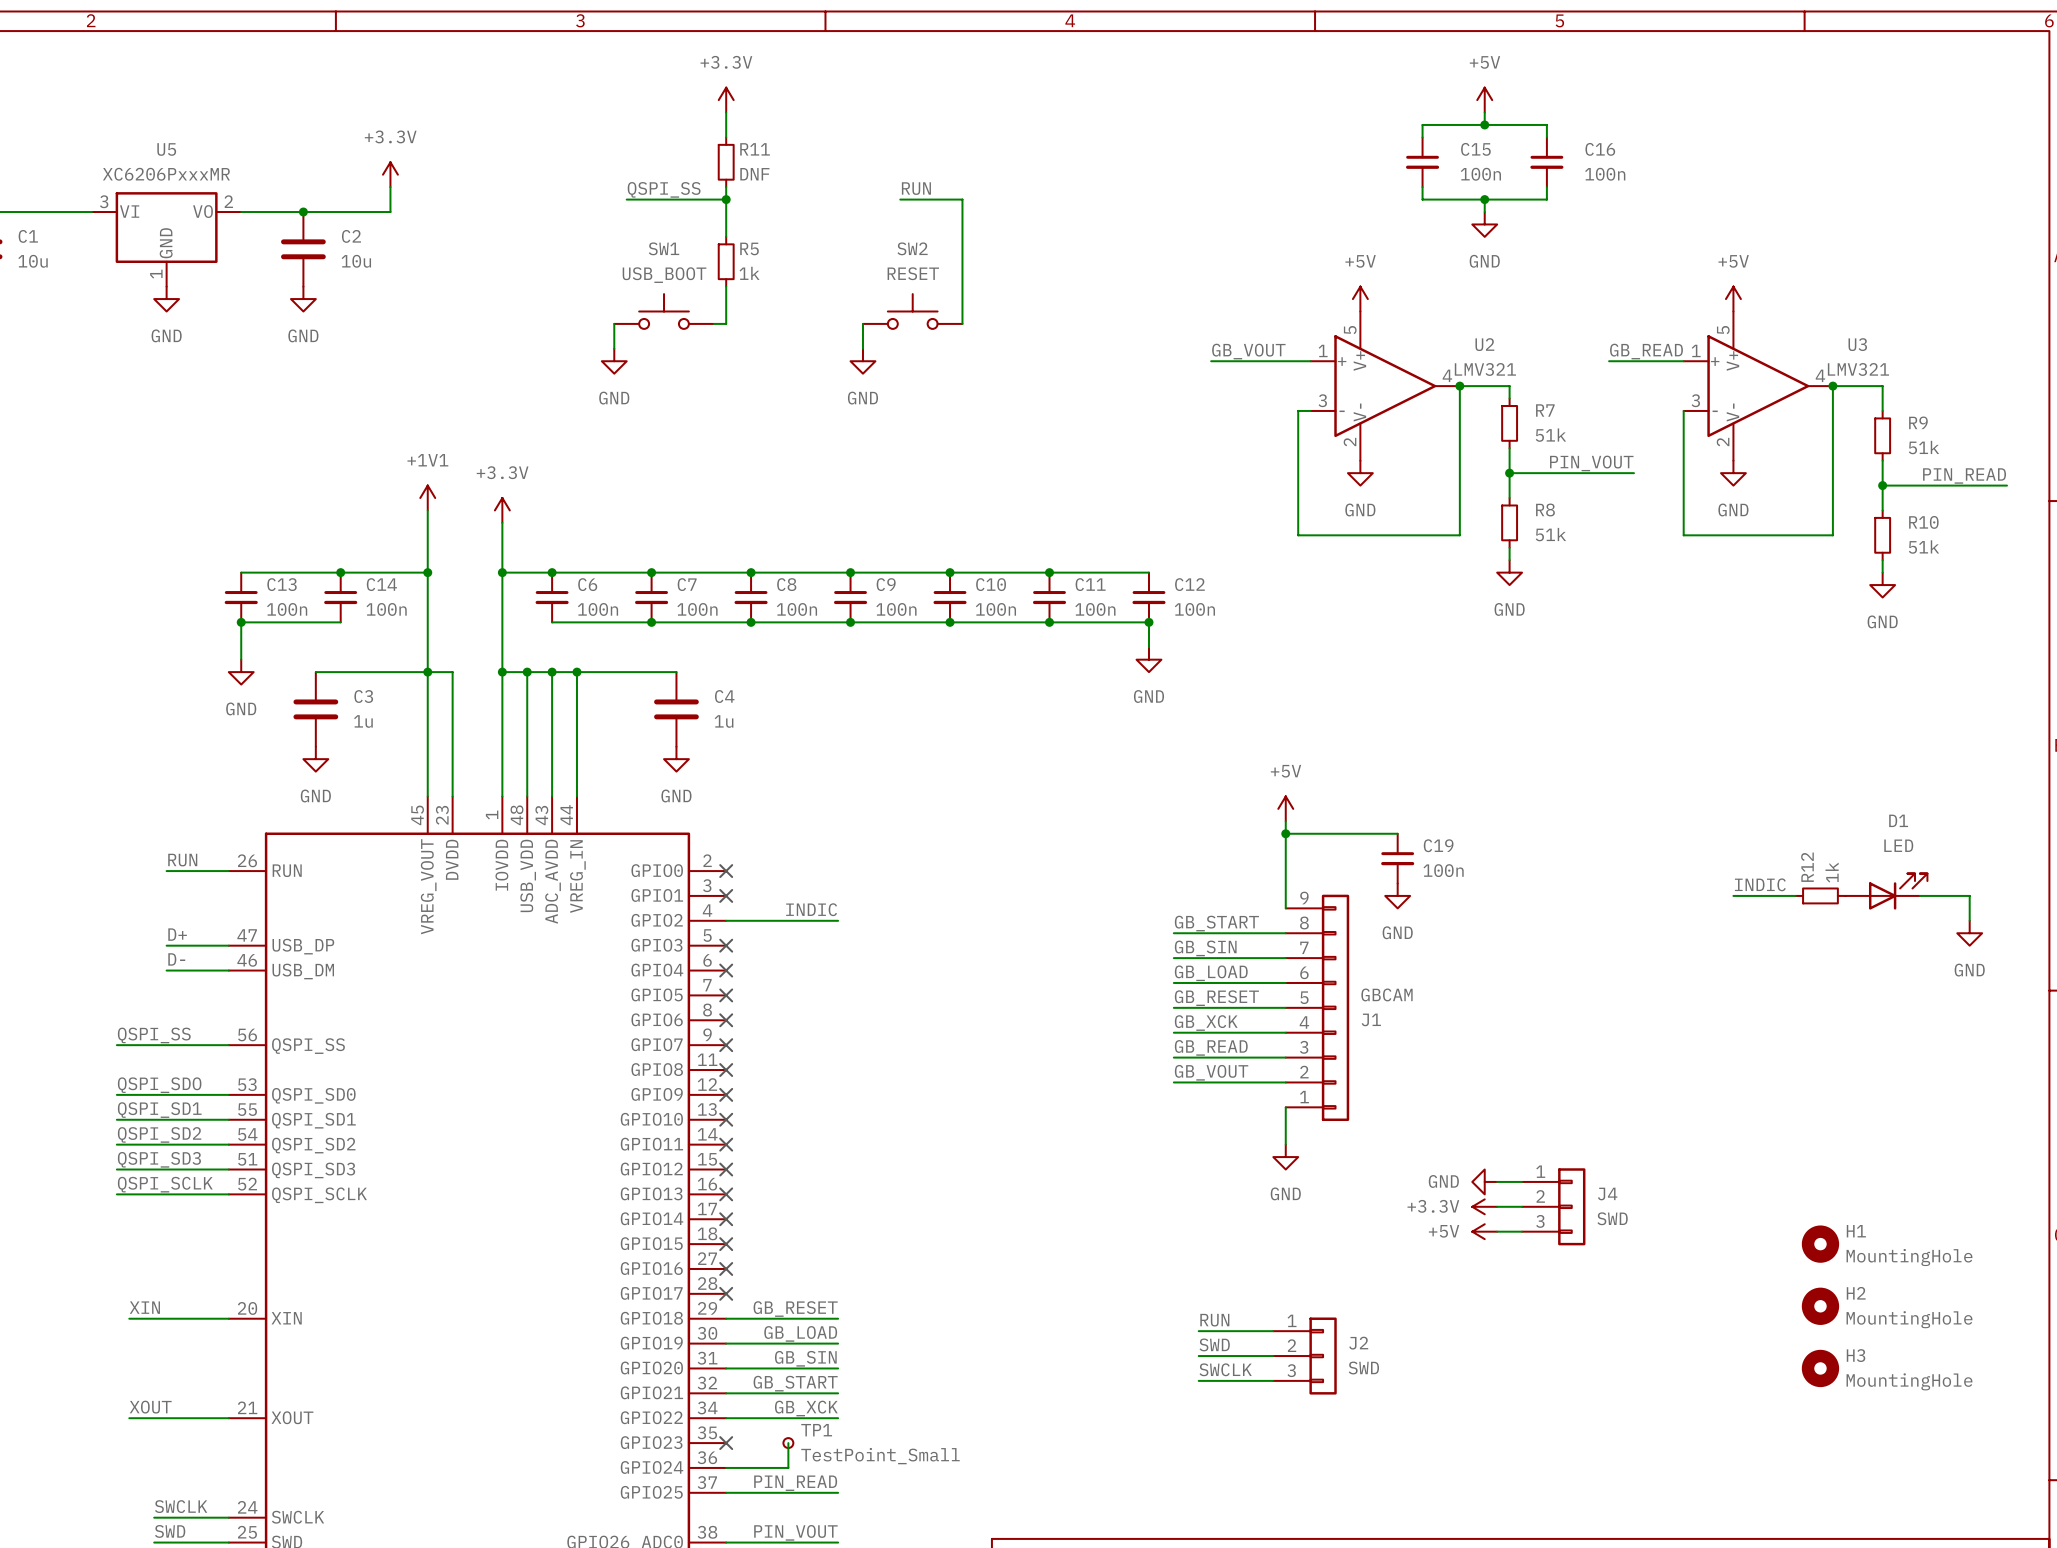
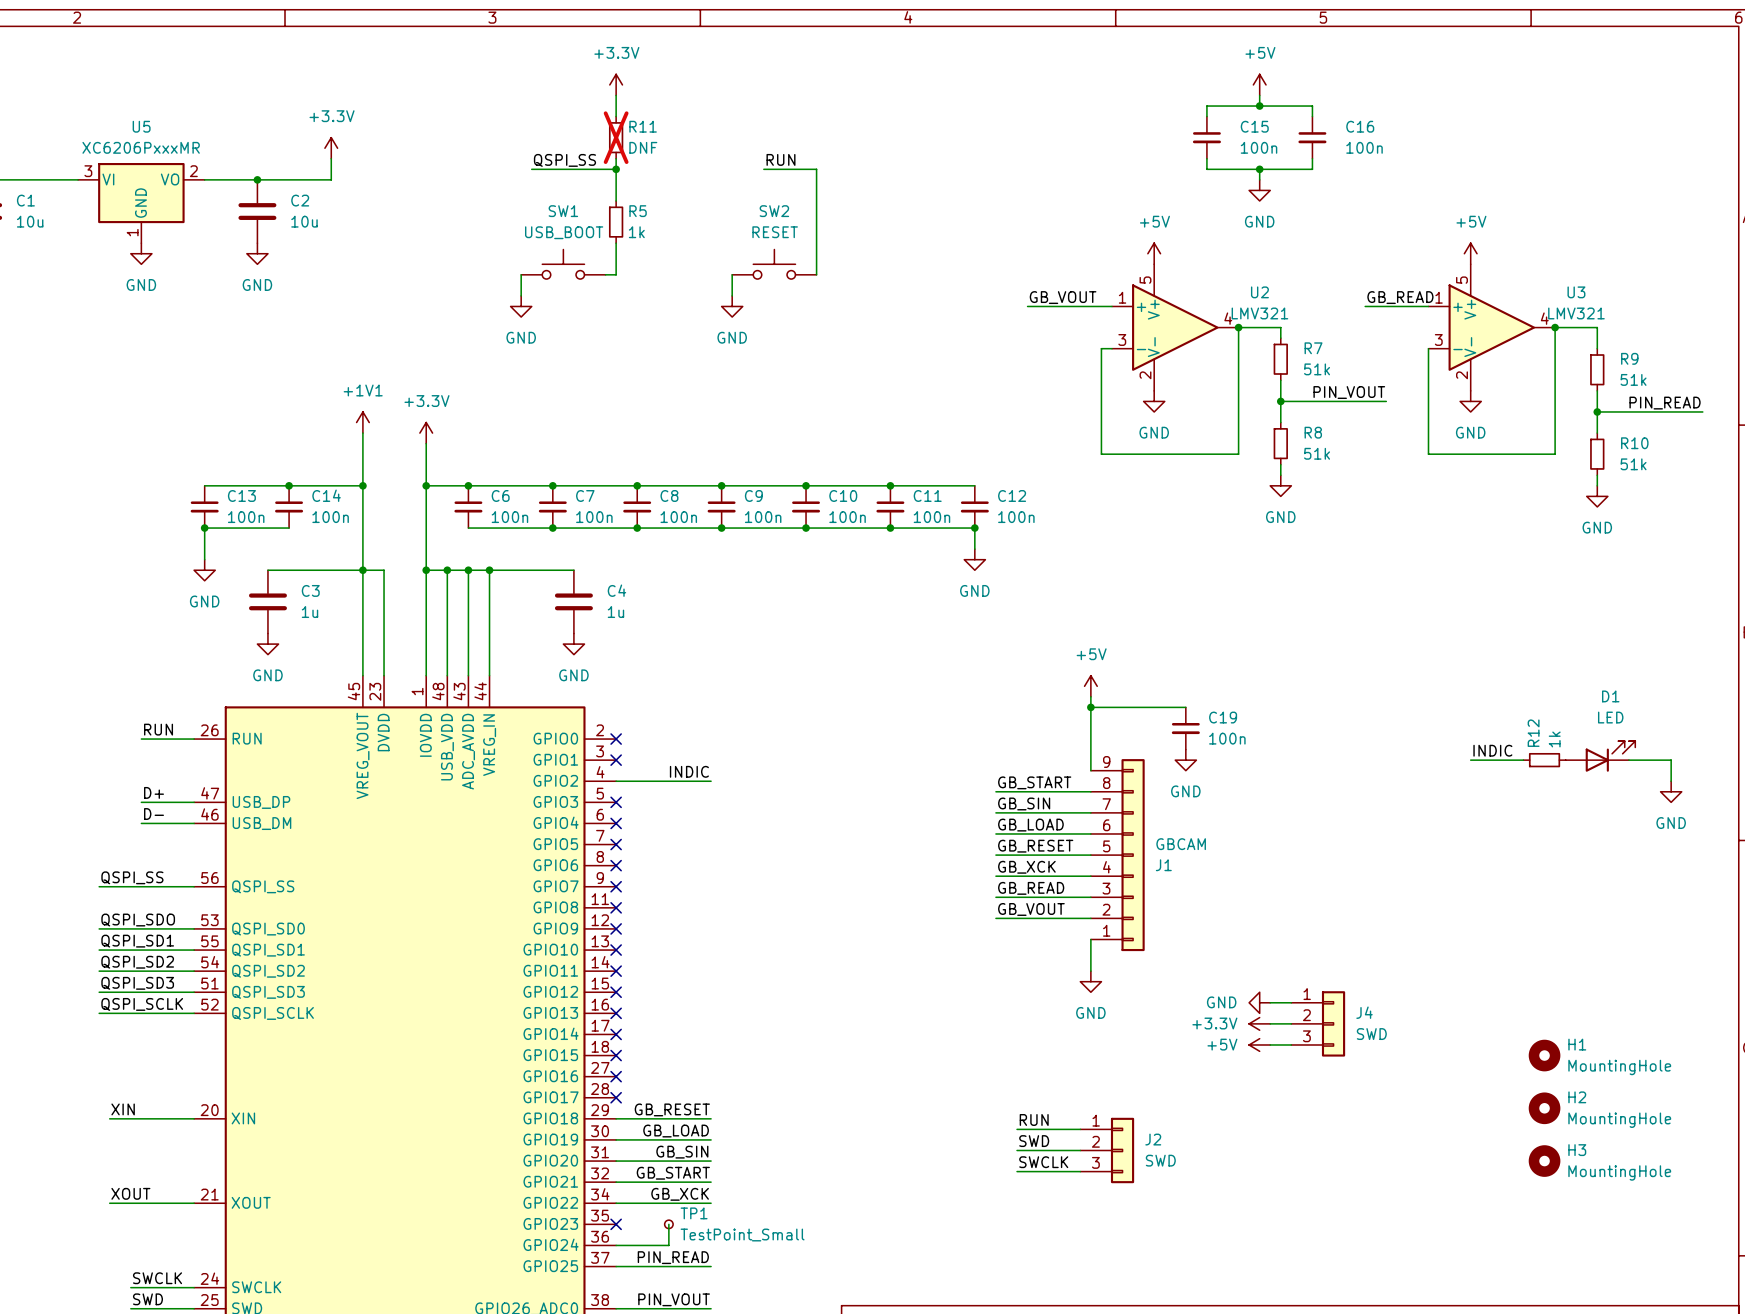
R11 do-not-place cross: none -> (616, 137)

